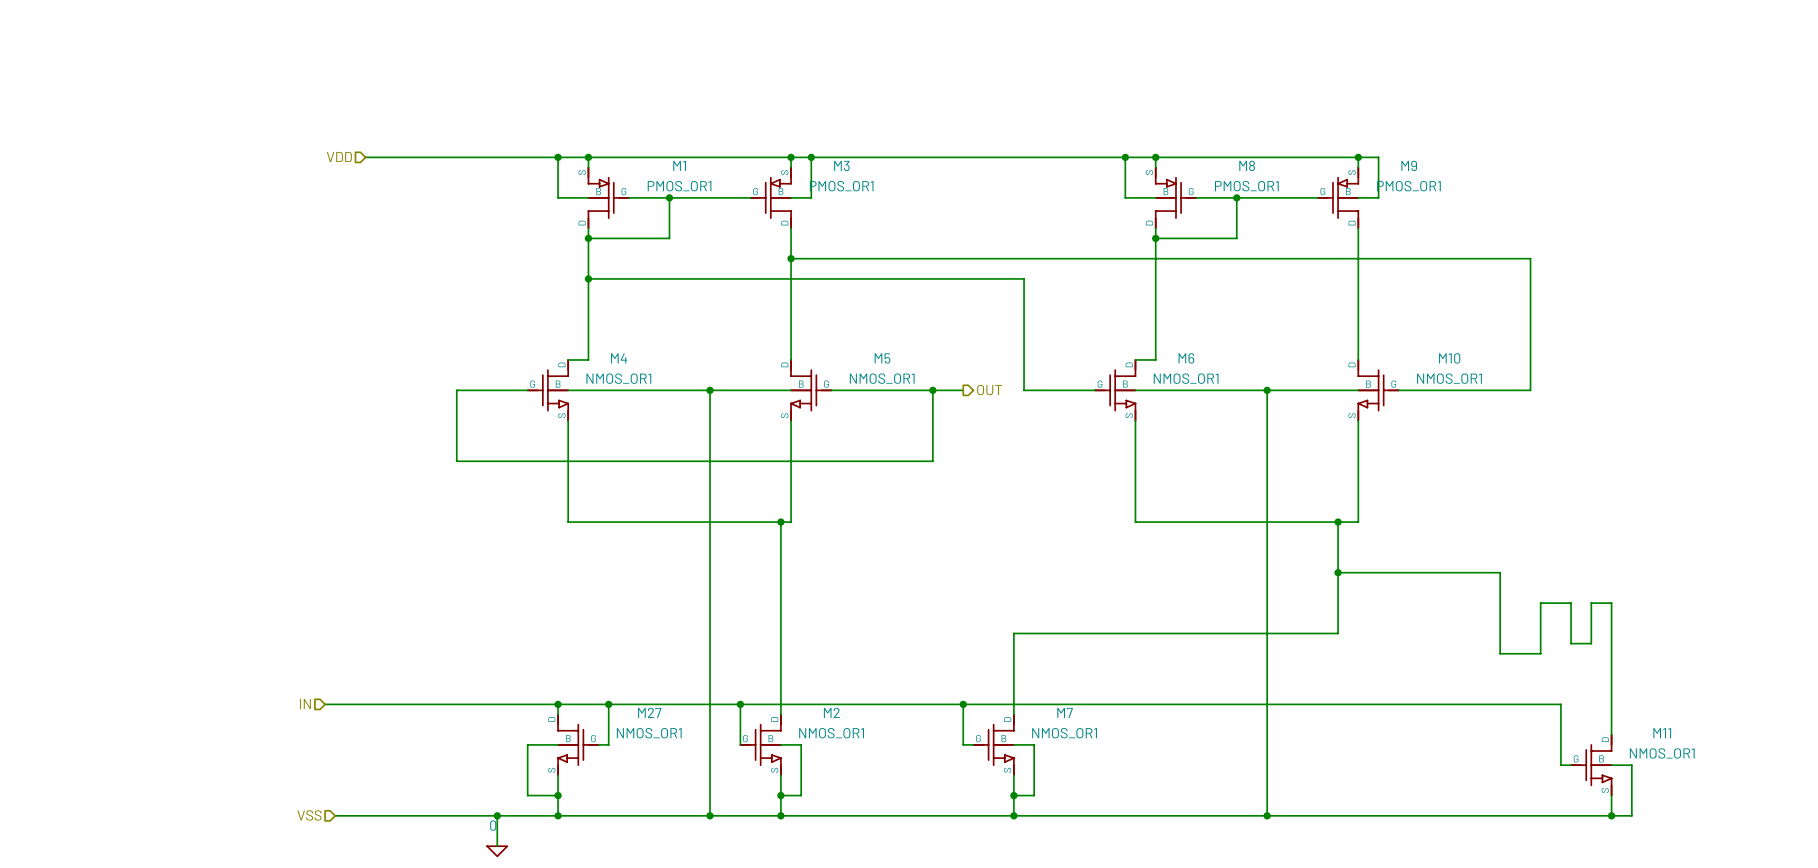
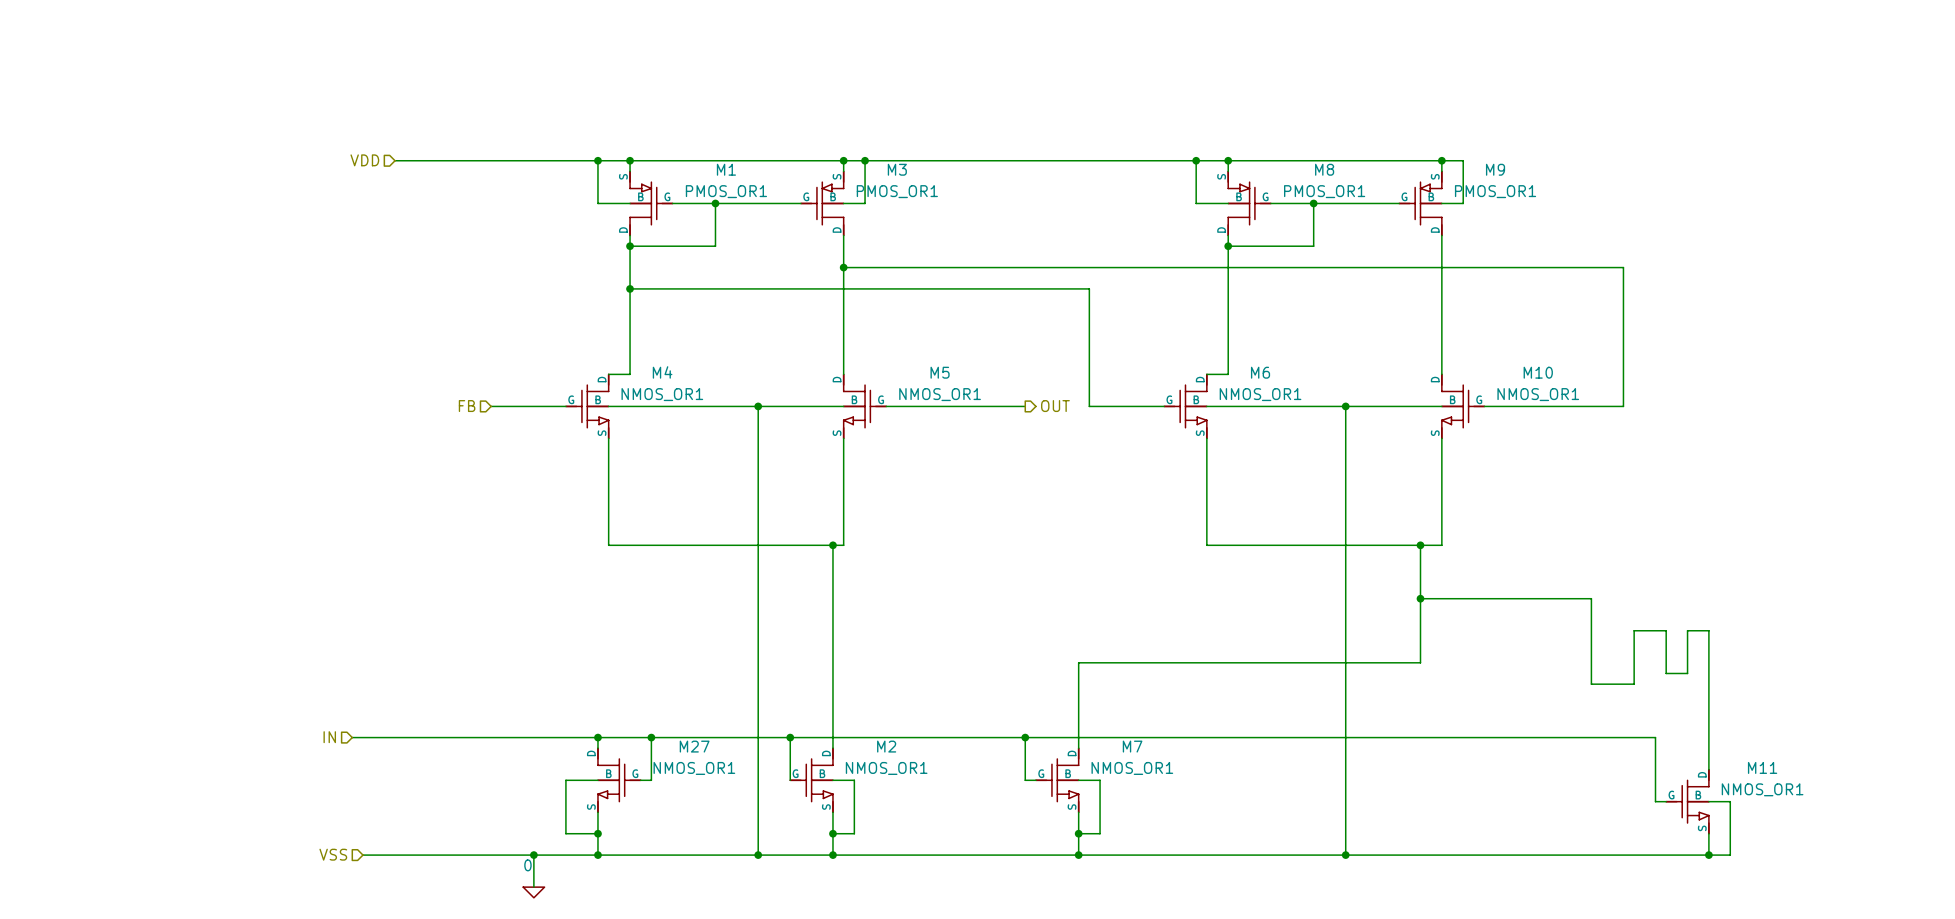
hierarchical label: none -> FB (467, 406)
wire: (456, 390) (456, 461) (932, 461) (932, 390) -> none
junction: (932, 390) -> none

